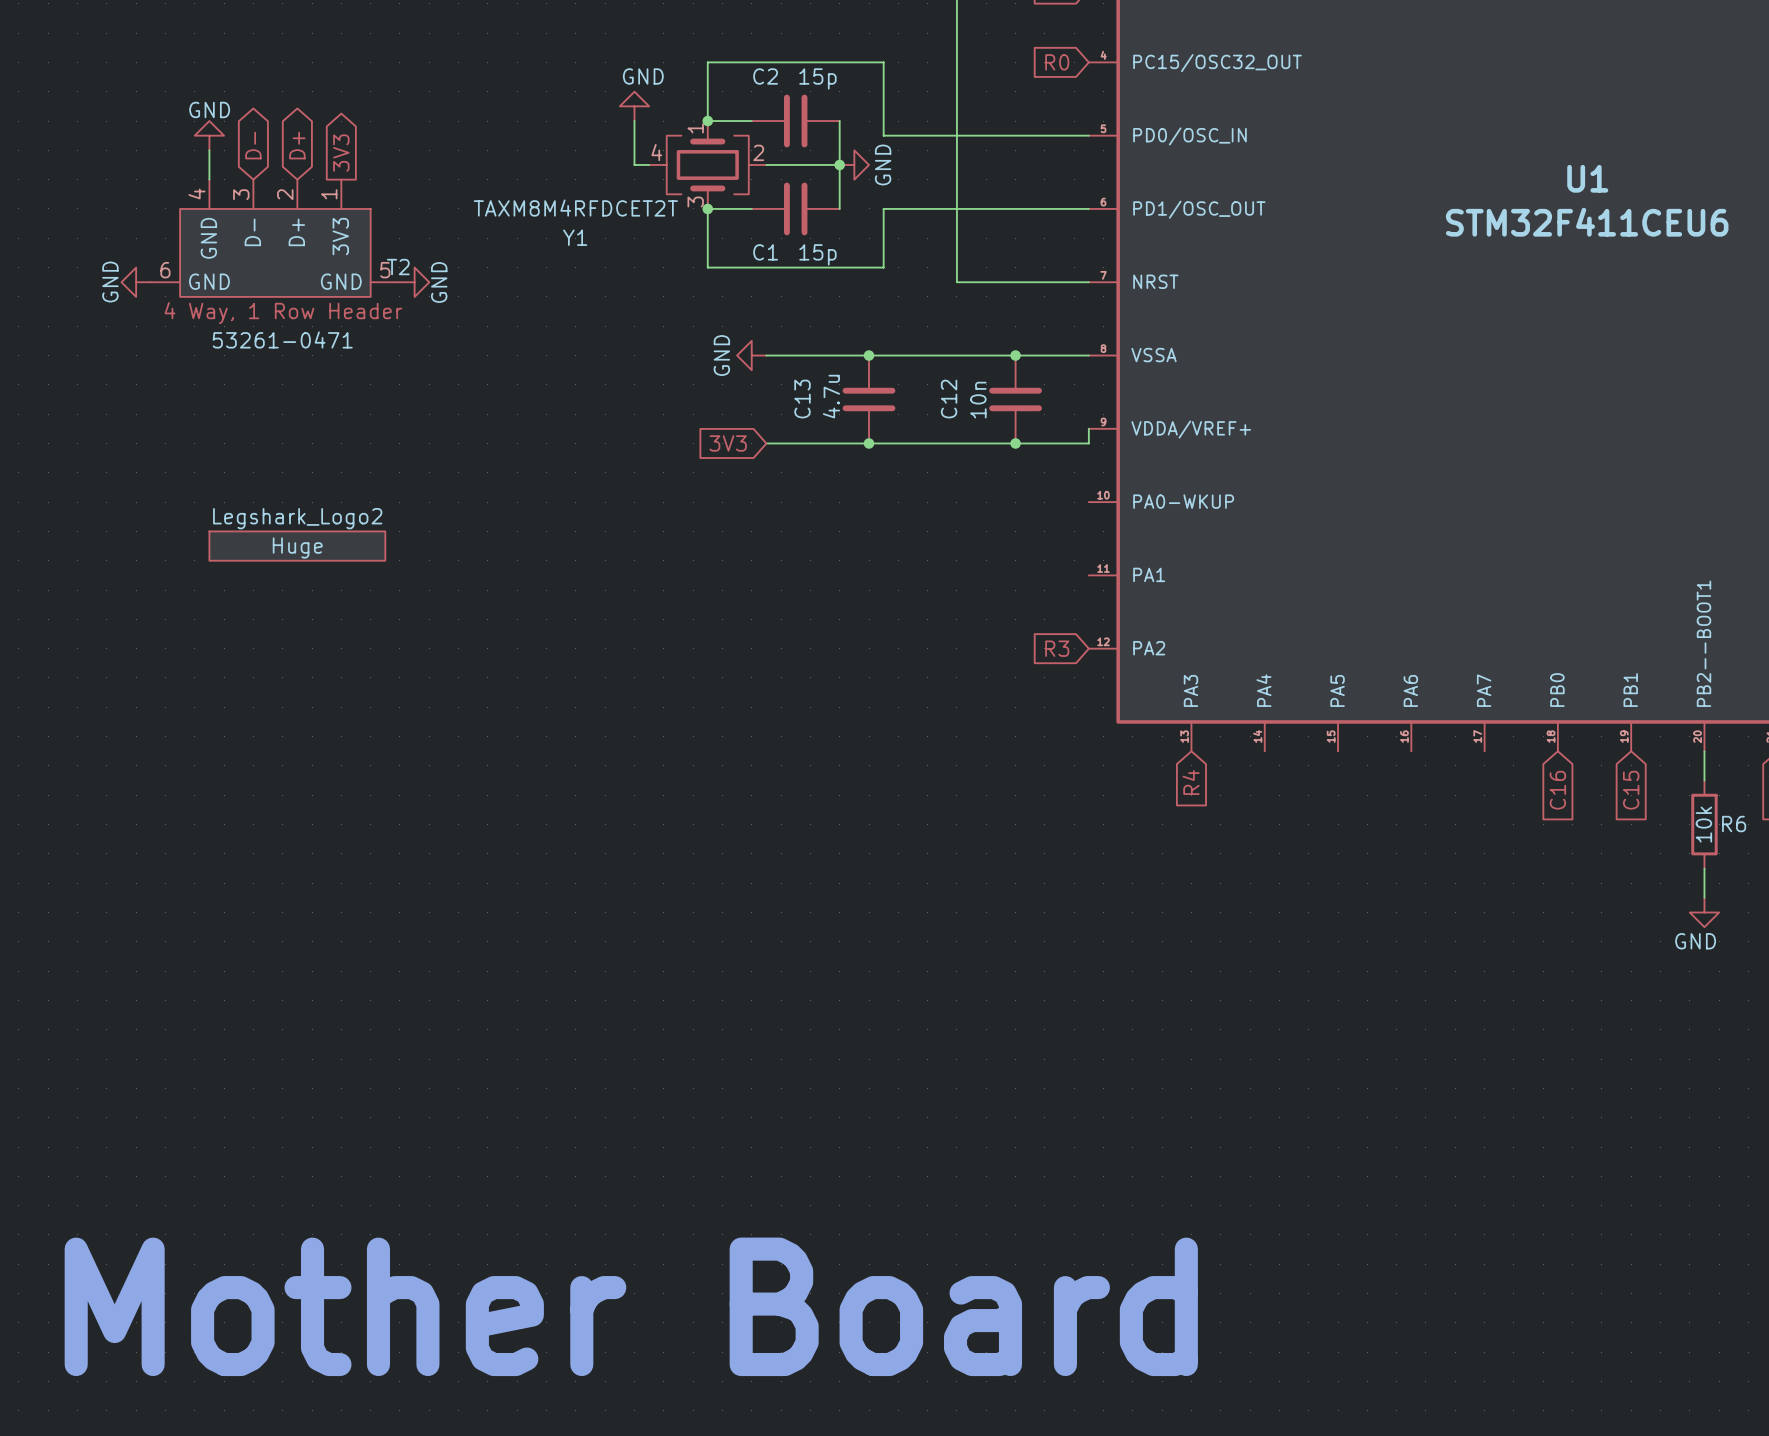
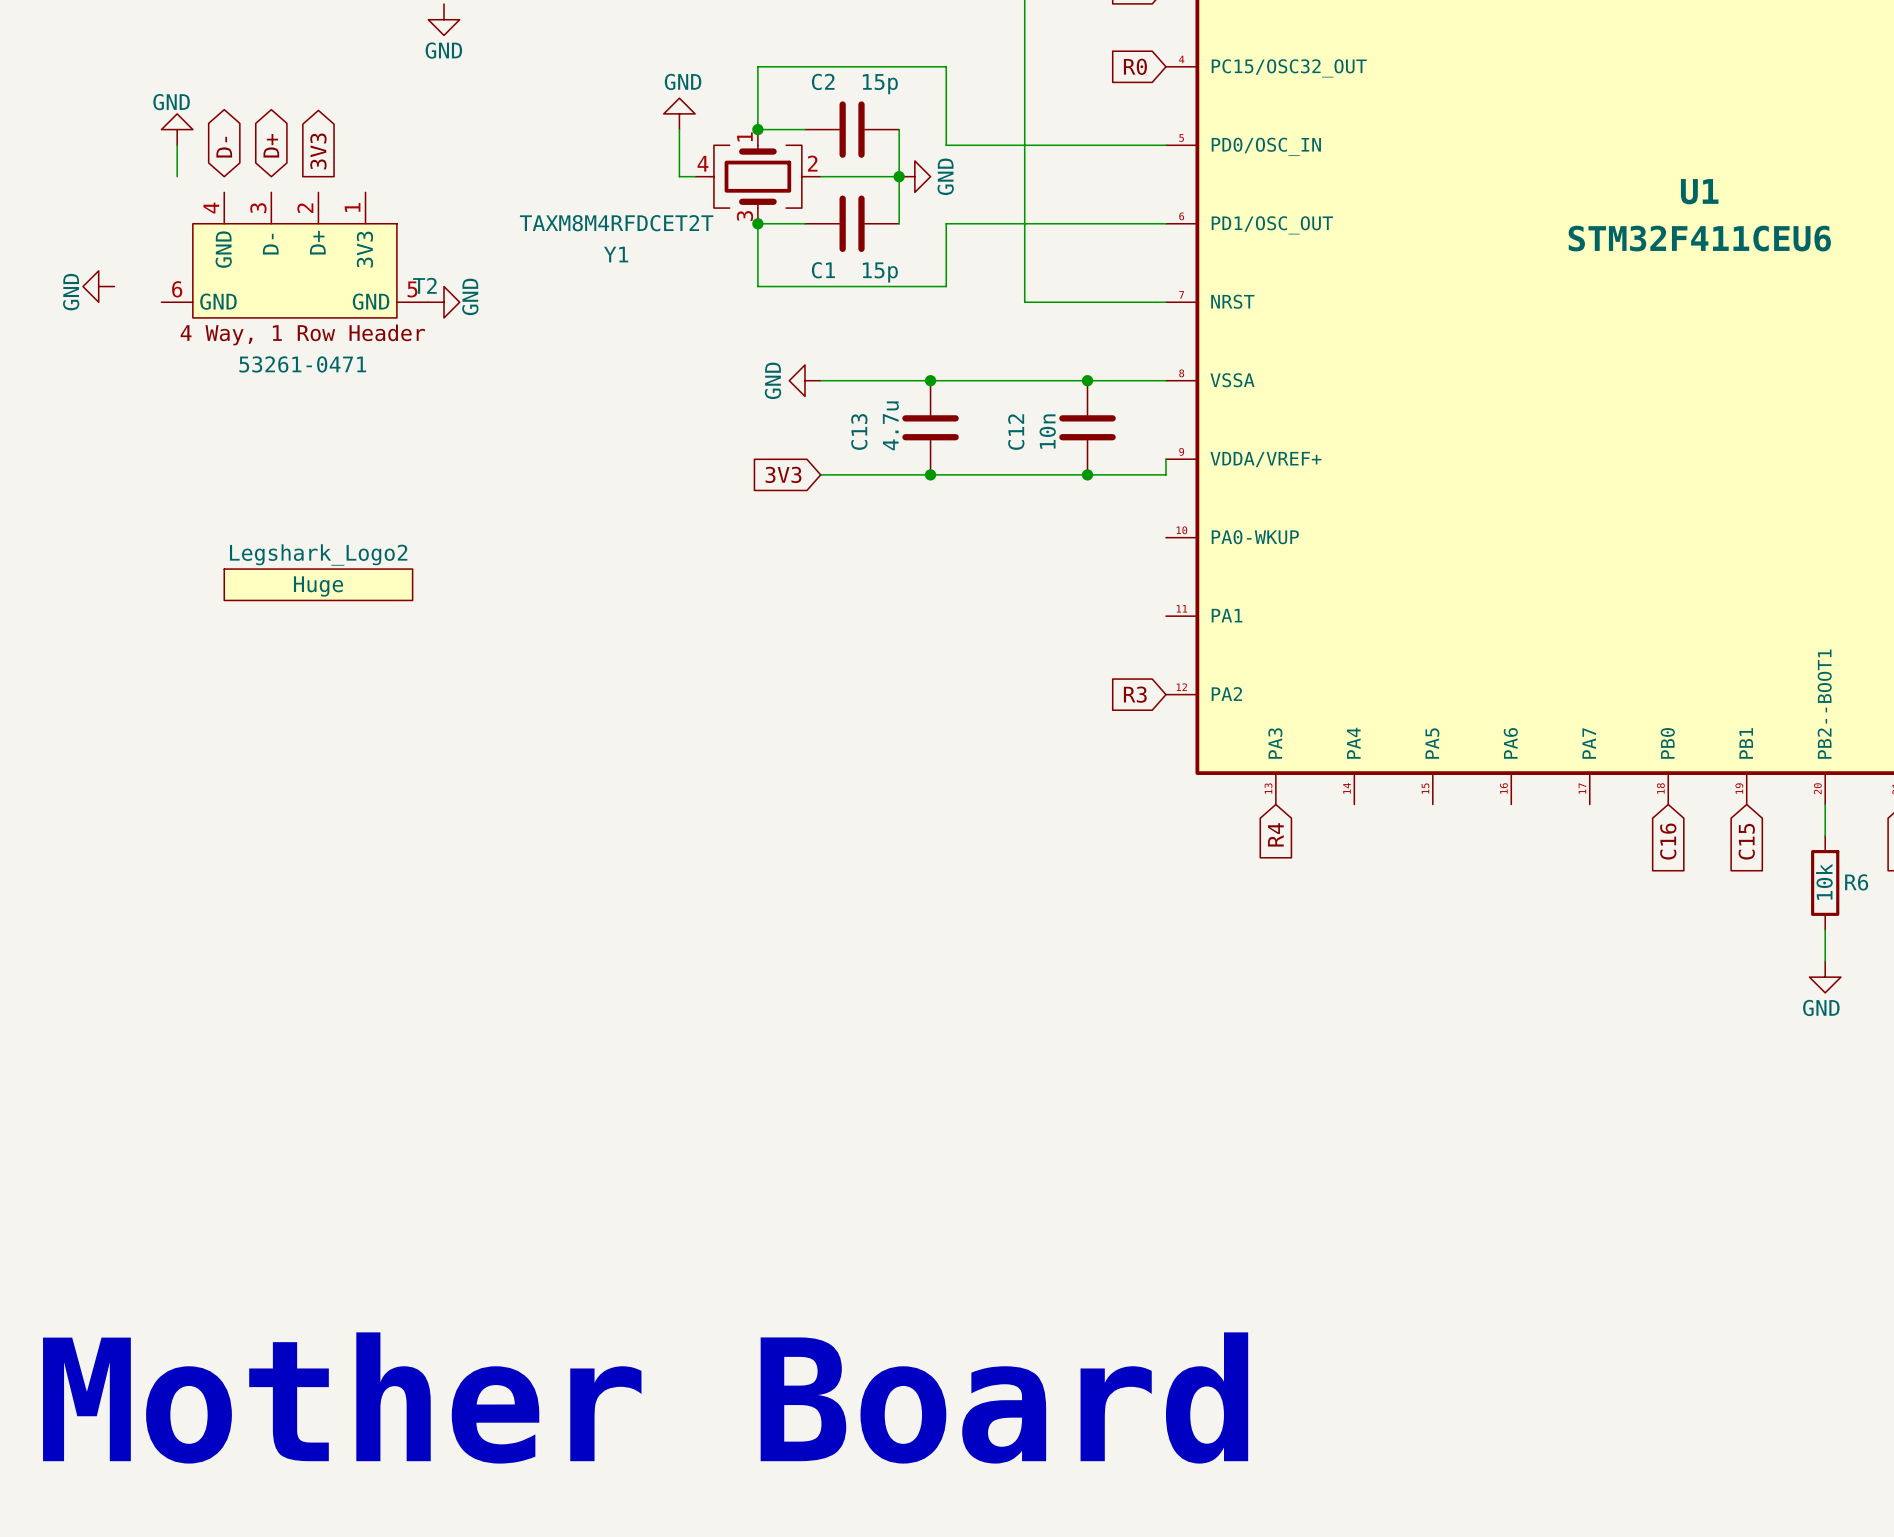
power symbol: none -> GND (443, 19)
power symbol position: GND (209, 135) -> GND (177, 129)
global label position: D- (253, 145) -> D- (224, 147)
global label position: D+ (297, 145) -> D+ (271, 145)
wire: (209, 150) (209, 179) -> (177, 145) (177, 176)
global label position: 3V3 (341, 153) -> 3V3 (318, 151)
power symbol position: GND (136, 282) -> GND (98, 286)

